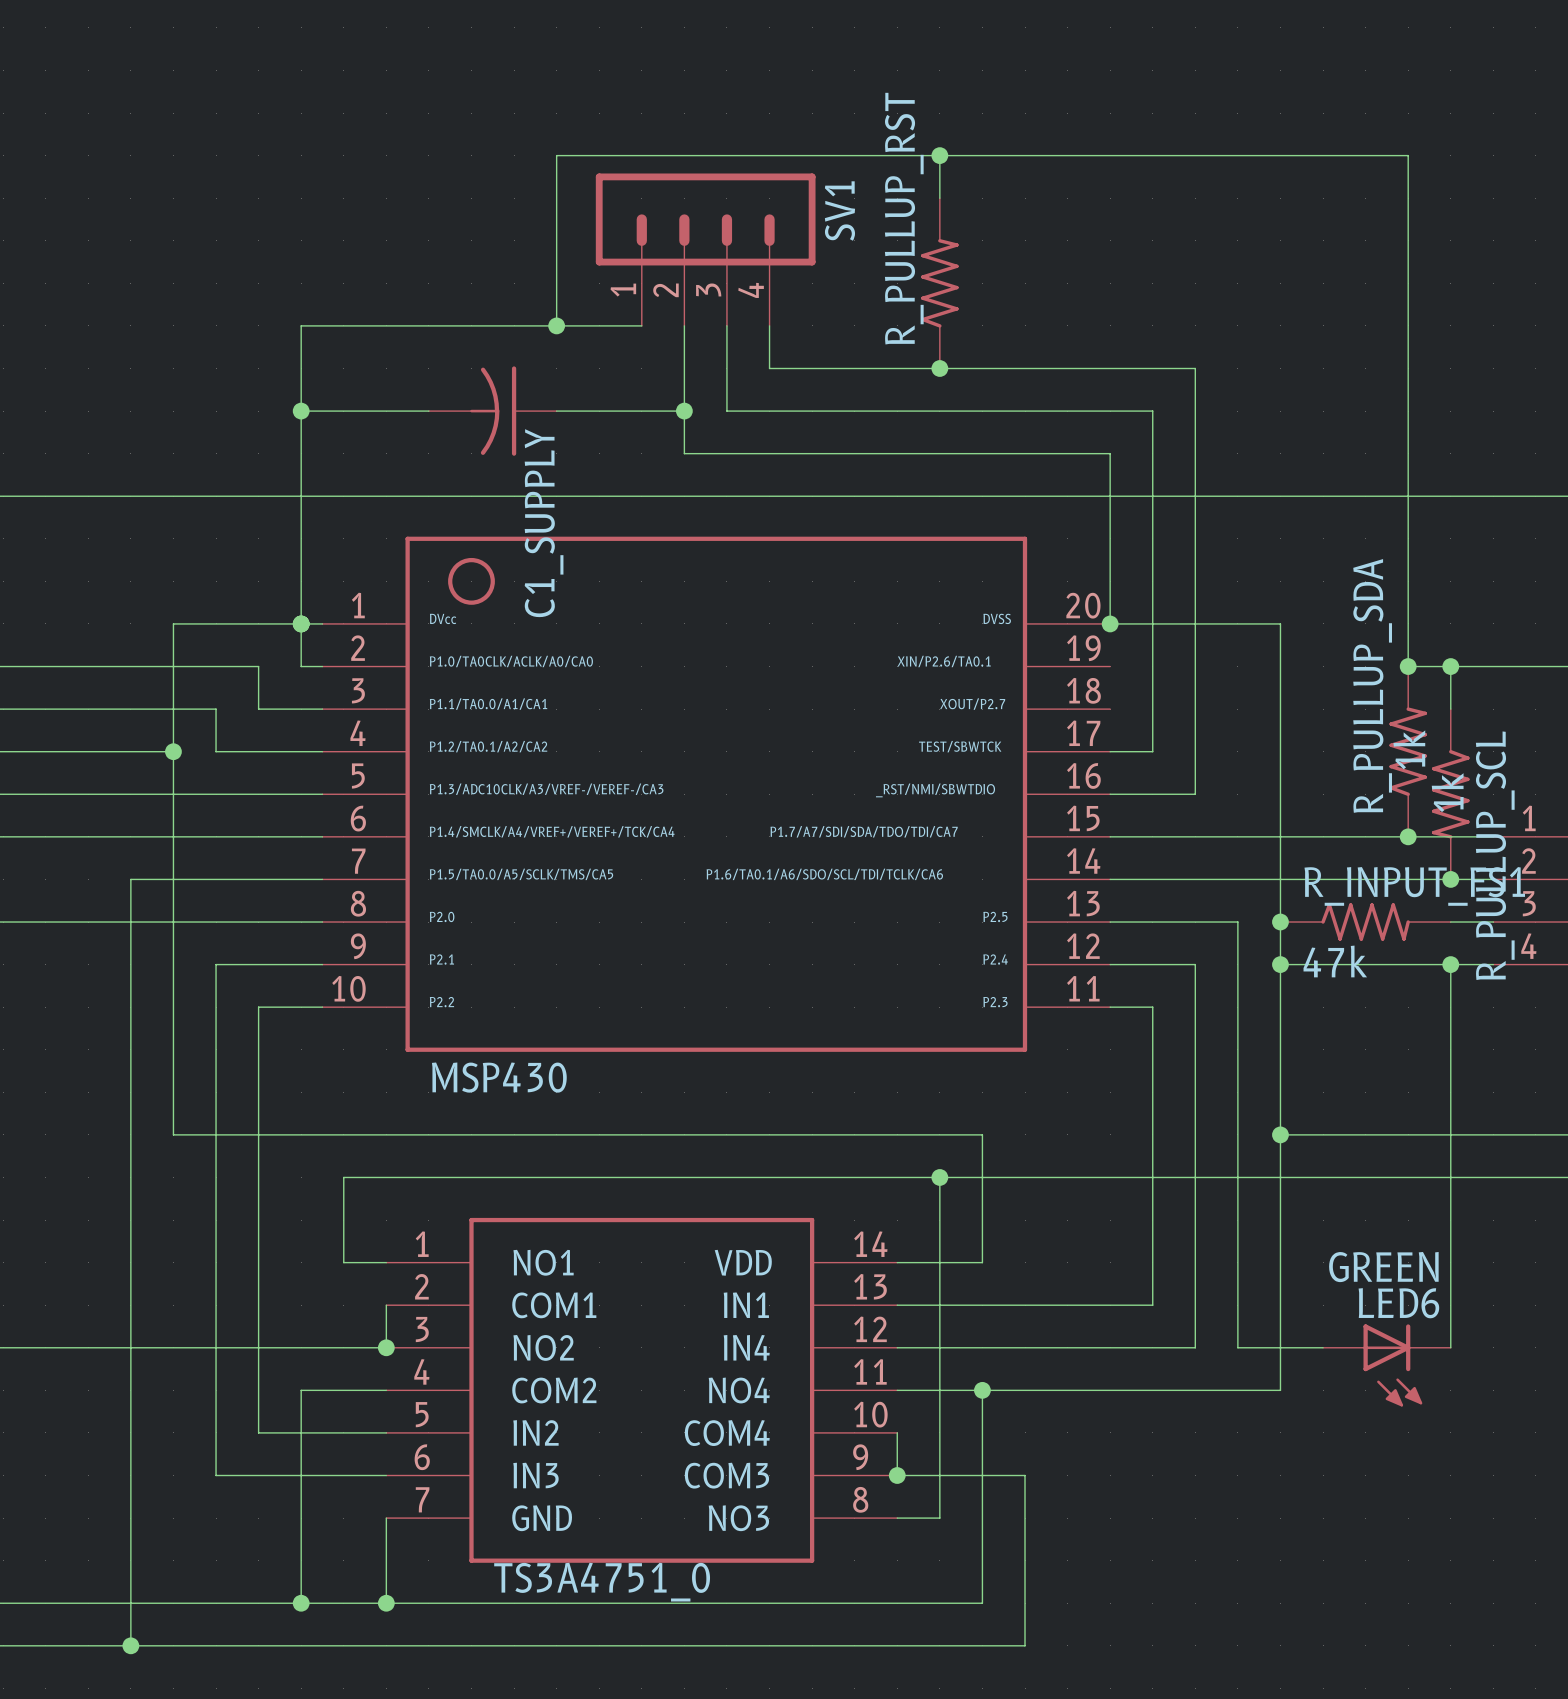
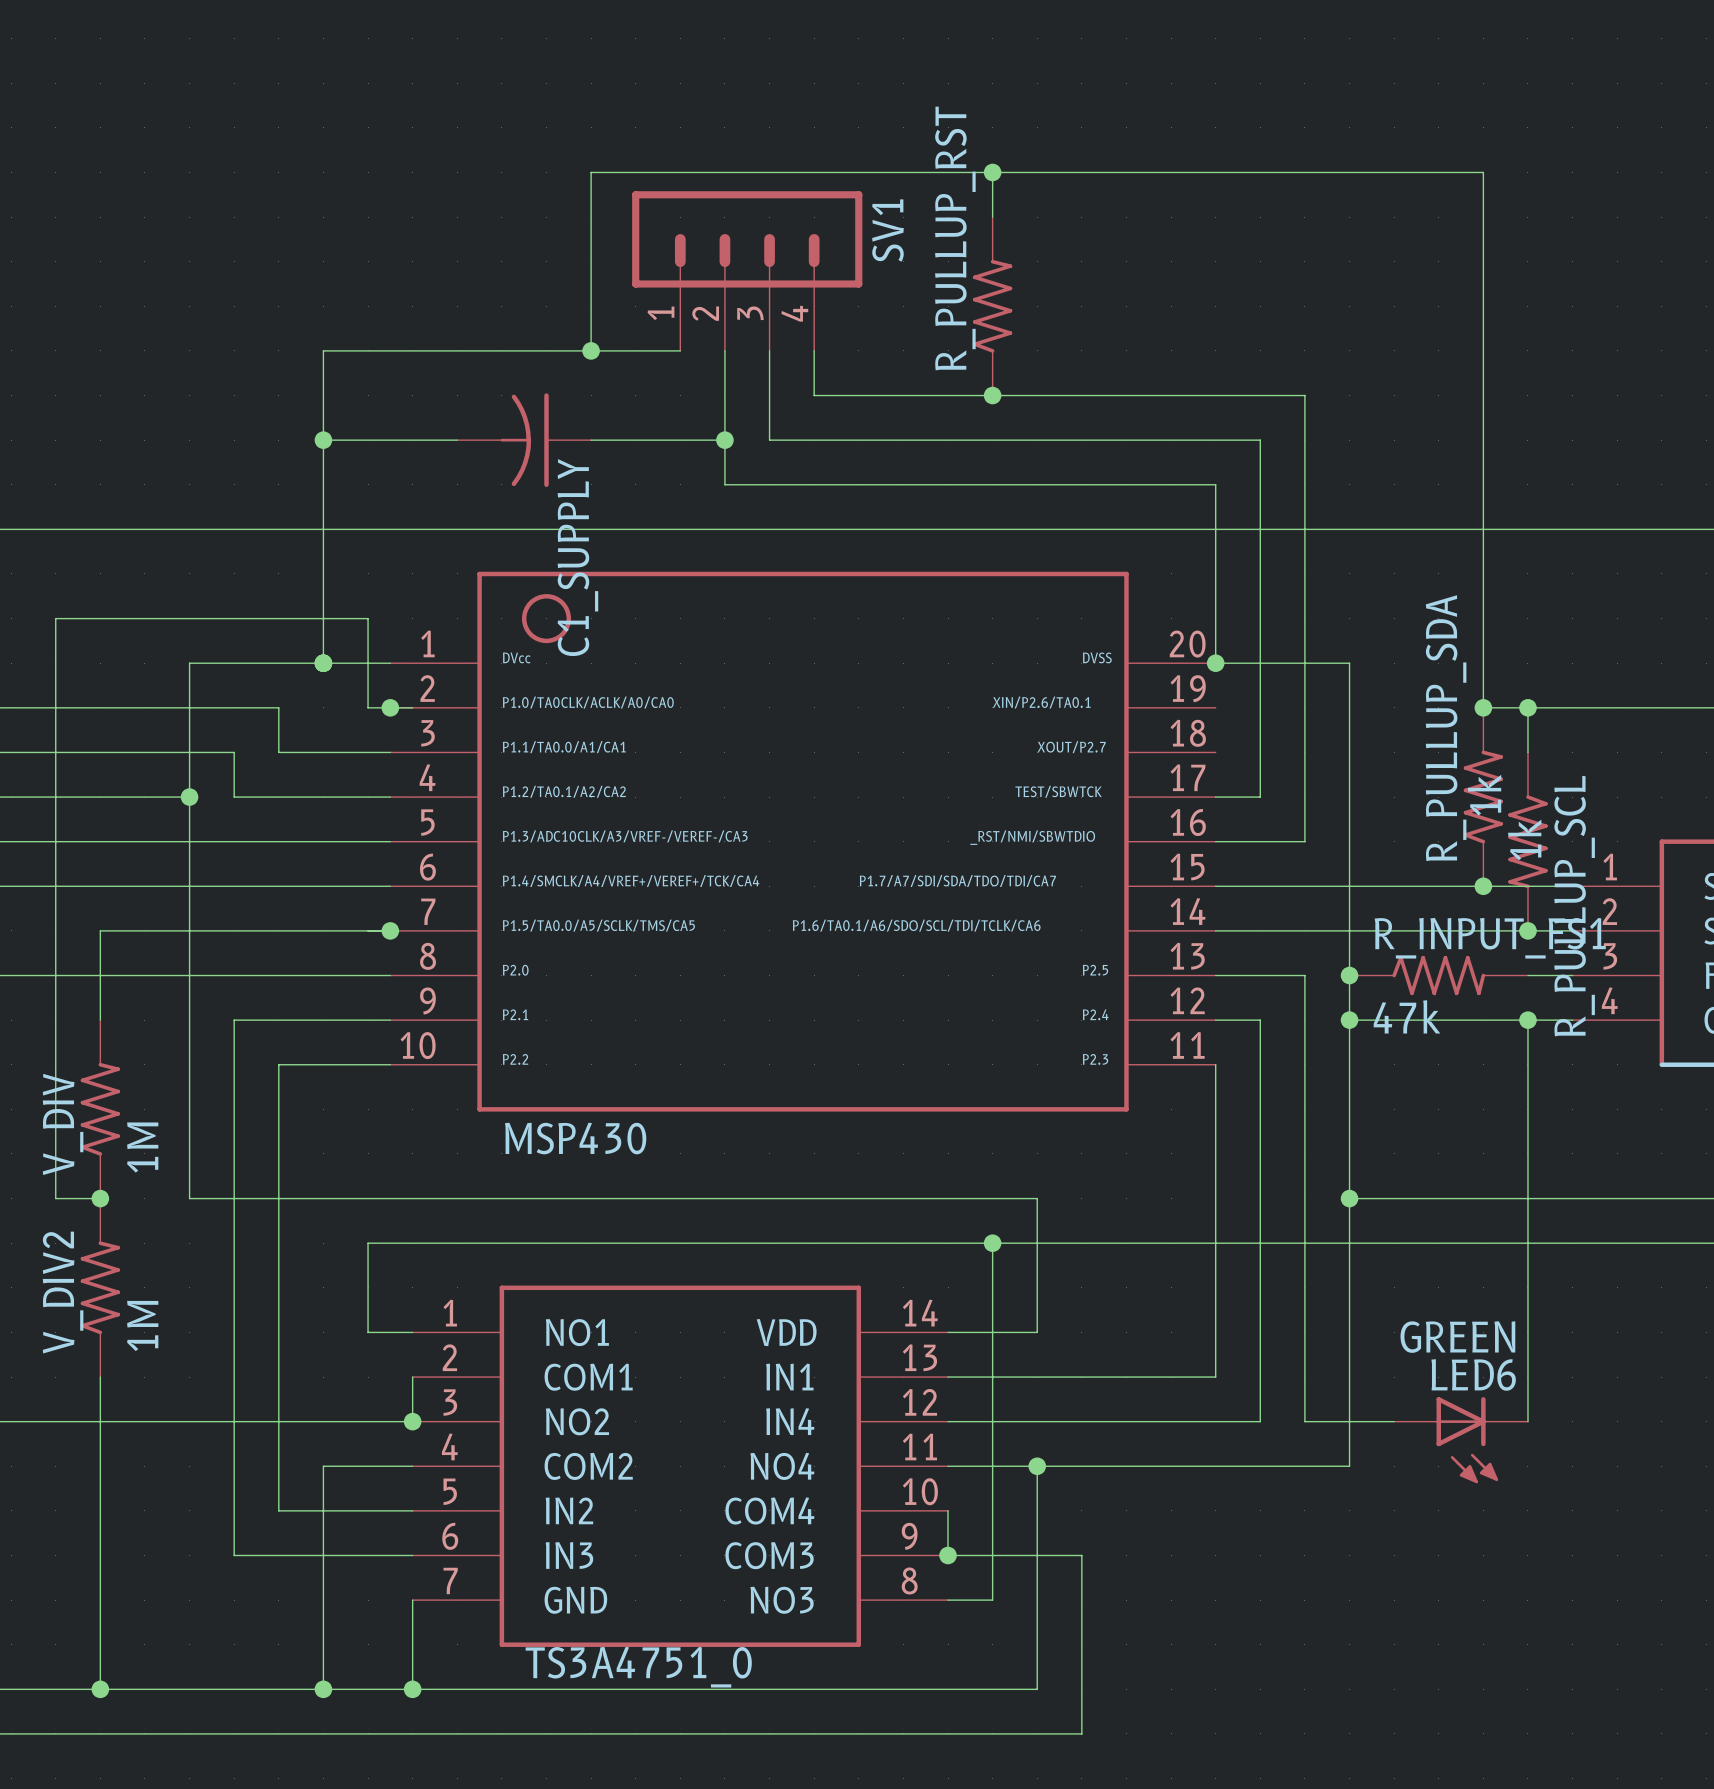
wire: (1195, 368) (1195, 411) -> (1215, 440) (1260, 440)
wire: none -> (1260, 395) (1304, 395) (1304, 841) (1260, 841)
wire: (1152, 411) (1152, 453) -> (1171, 484) (1215, 484)
wire: (1110, 453) (1110, 623) (1152, 623) (1152, 751) (1110, 751) -> none
wire: (301, 623) (301, 666) (322, 666) -> none
junction position: (1110, 623) -> (1215, 663)
junction: none -> (390, 707)
wire: none -> (412, 707) (368, 707) (368, 618) (55, 618) (55, 1198) (100, 1198)
wire: (1195, 751) (1195, 794) -> (1260, 797) (1215, 797)
MSP430 position: (716, 794) -> (803, 841)
wire: (130, 879) (130, 1645) -> (144, 930) (100, 930) (100, 1020)
junction: none -> (390, 930)
V_DIV: none -> 1M (100, 1109)
junction: none -> (100, 1198)
V_DIV2: none -> 1M (100, 1287)
wire: none -> (100, 1377) (100, 1689)
junction position: (130, 1645) -> (100, 1689)

